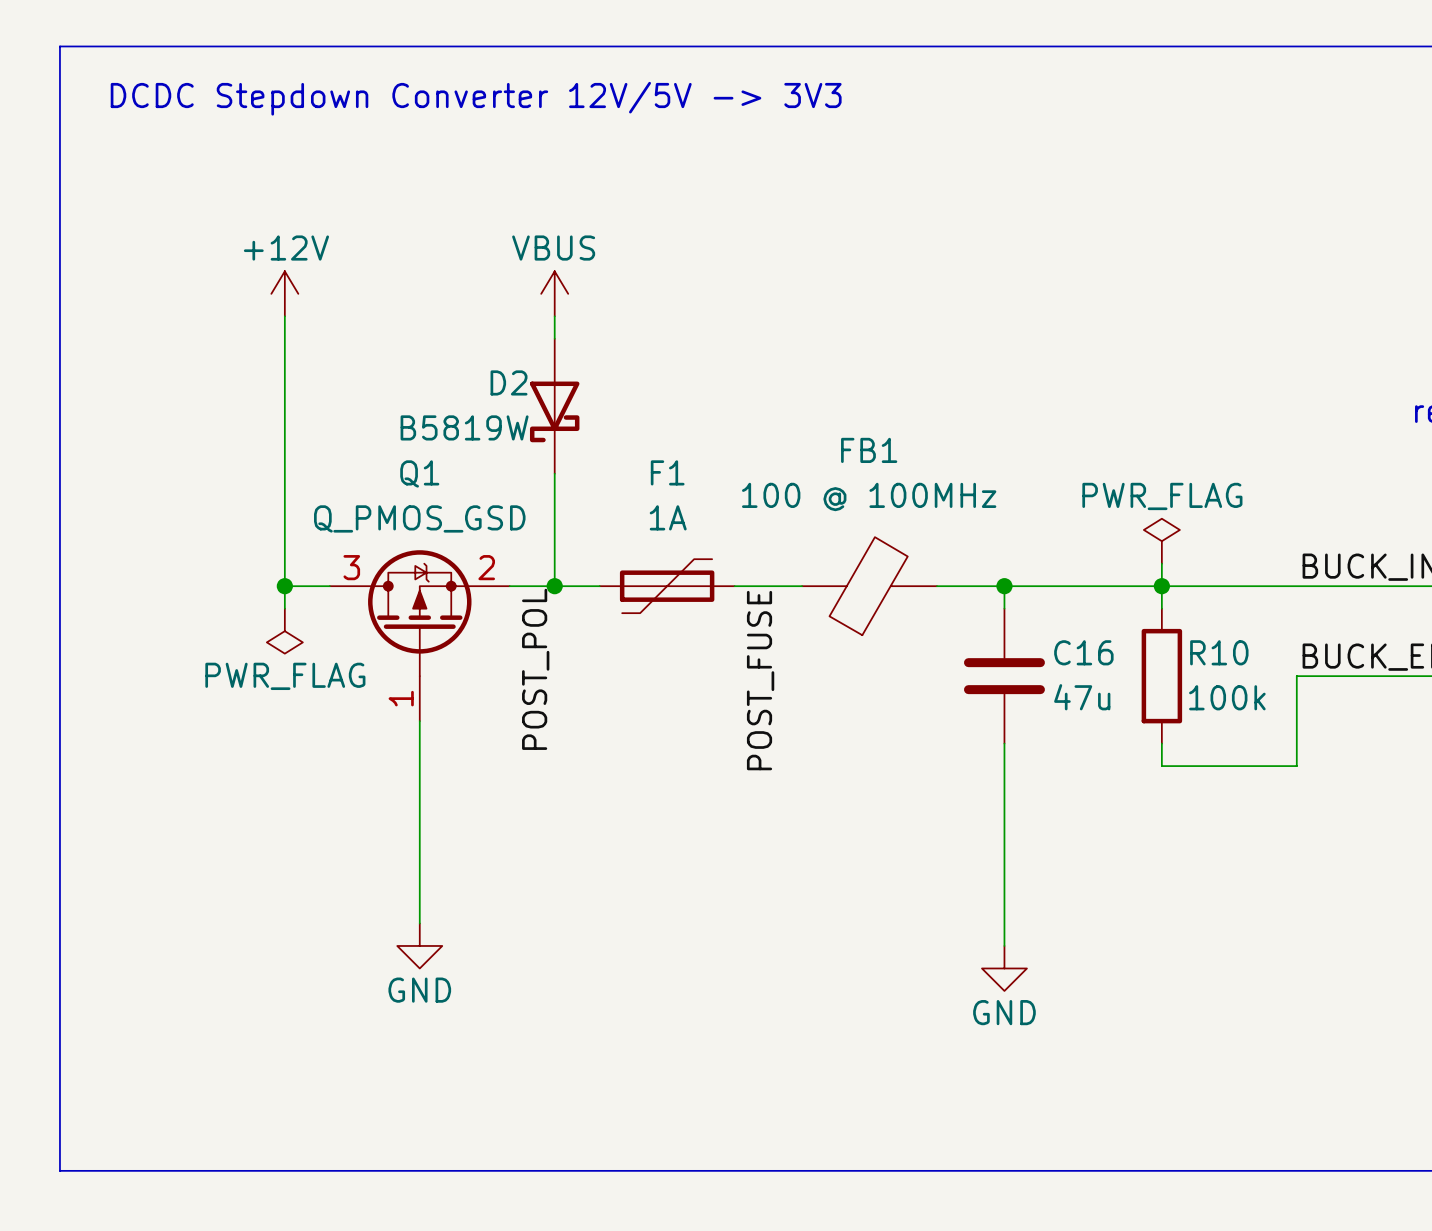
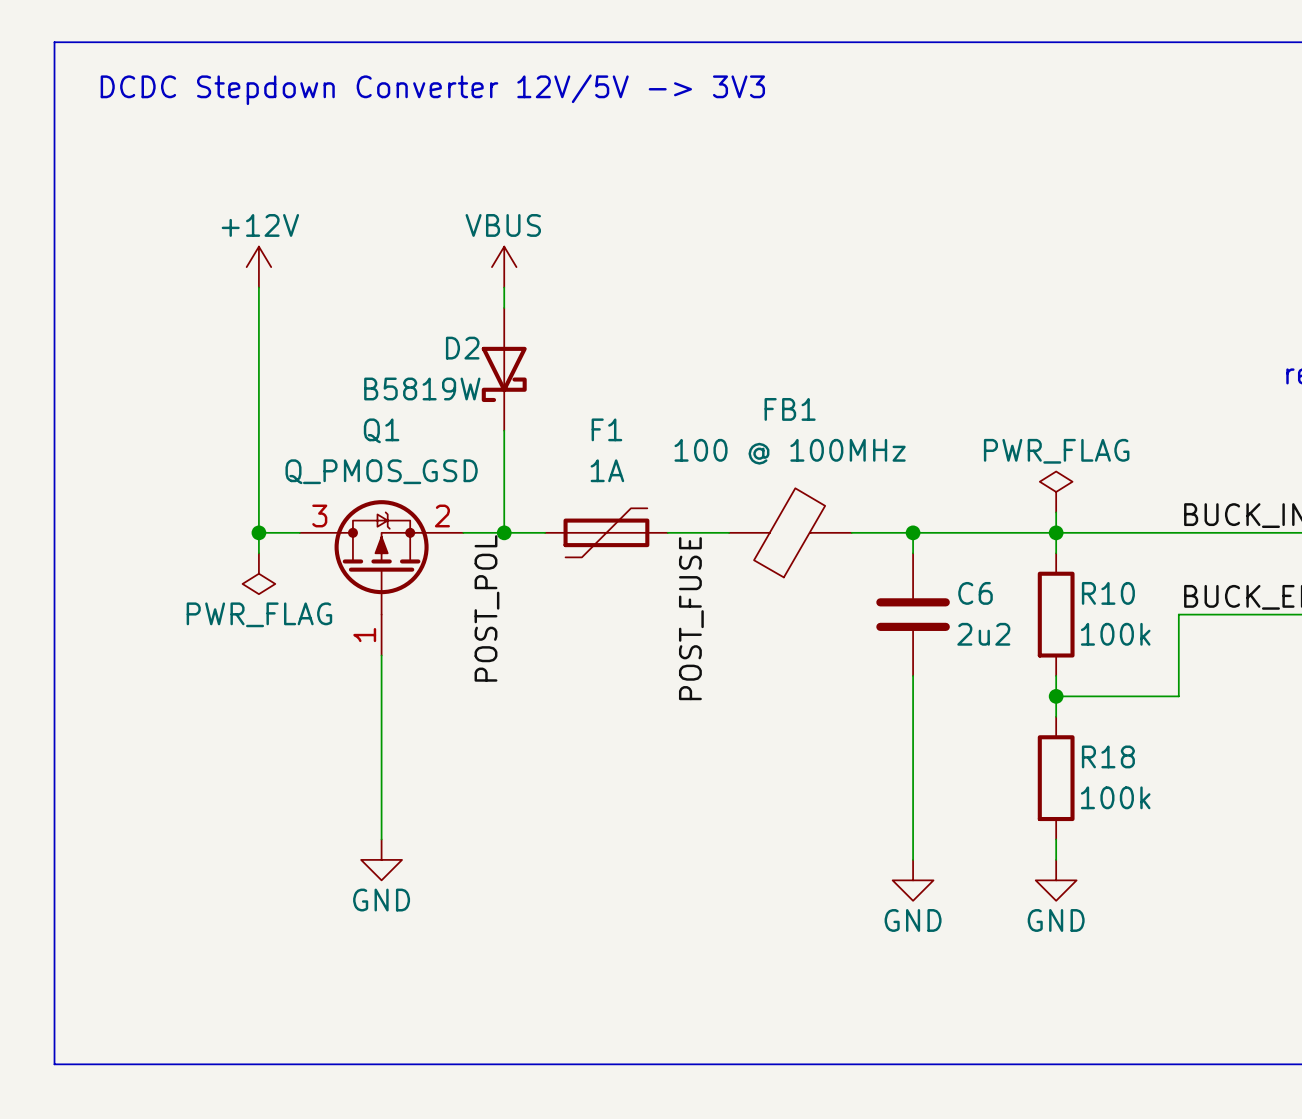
C16 name: C16 (1083, 652) -> C6 (975, 593)
C16 value: 47u (1082, 697) -> 2u2 (983, 634)
wire: none -> (1056, 696) (1056, 716)
junction: none -> (1056, 696)
R18: none -> 100k (1056, 778)
wire: none -> (1056, 839) (1056, 859)
power symbol: none -> GND (1056, 880)

